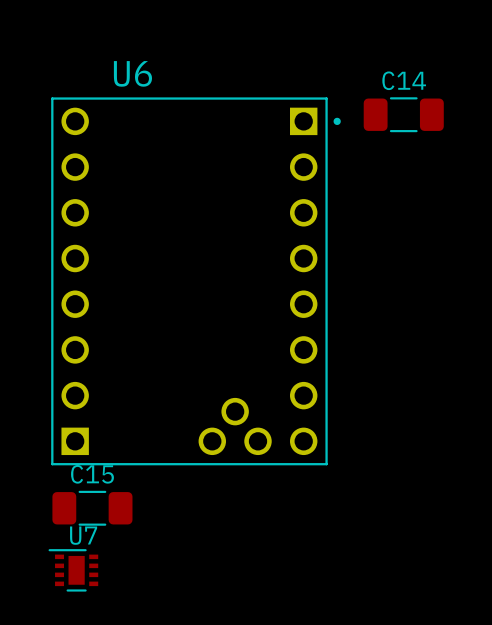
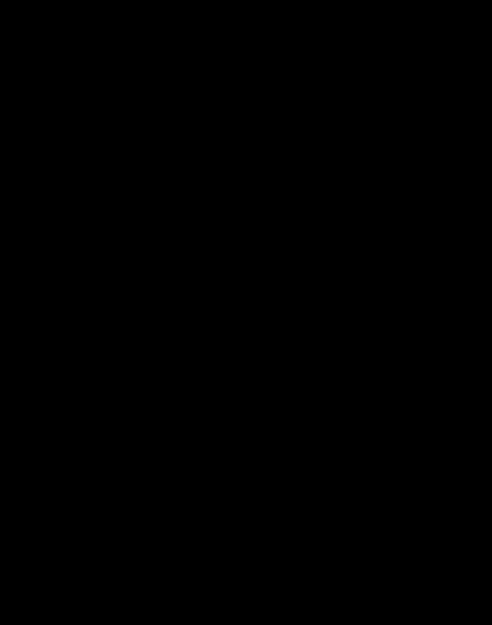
C14: (403, 114) -> none
U6: (195, 281) -> none
C15: (92, 508) -> none
U7: (73, 570) -> none

